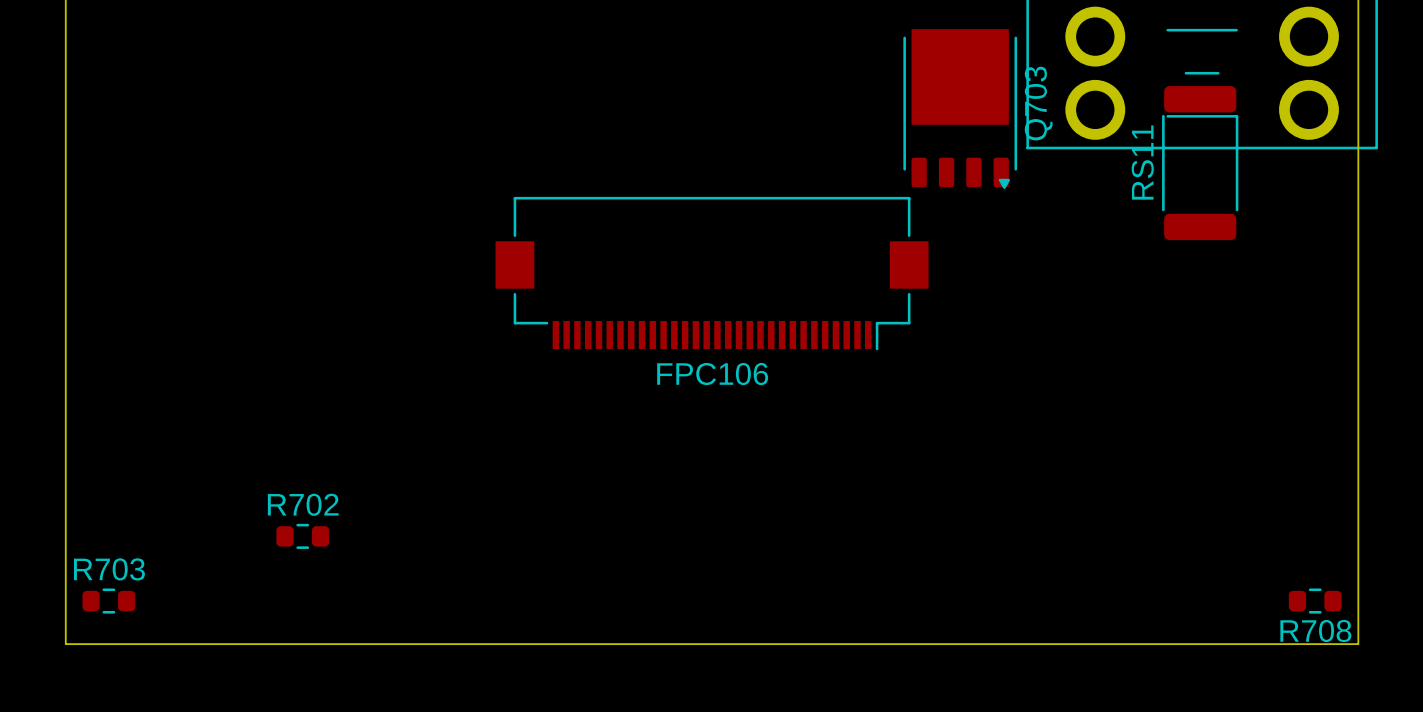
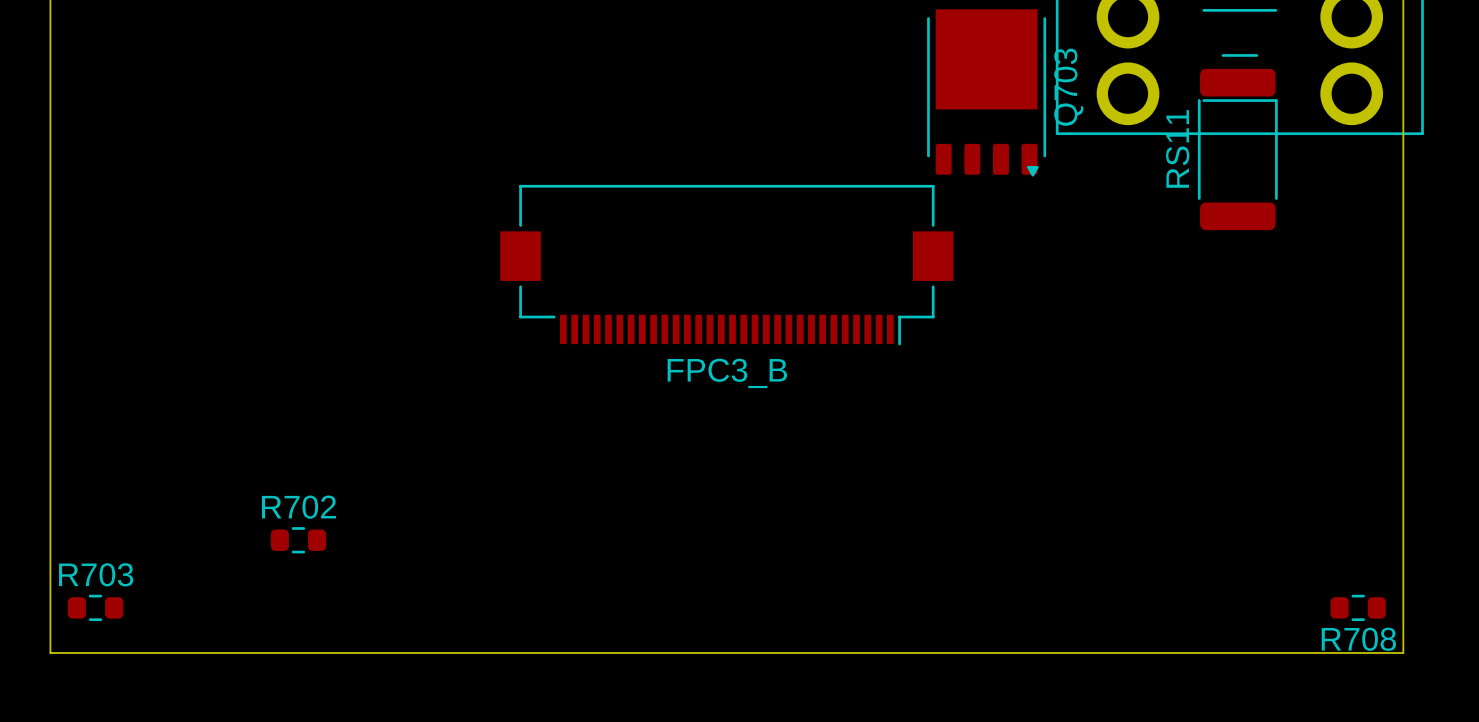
FPC106 name: FPC106 (712, 374) -> FPC3_B (727, 373)

